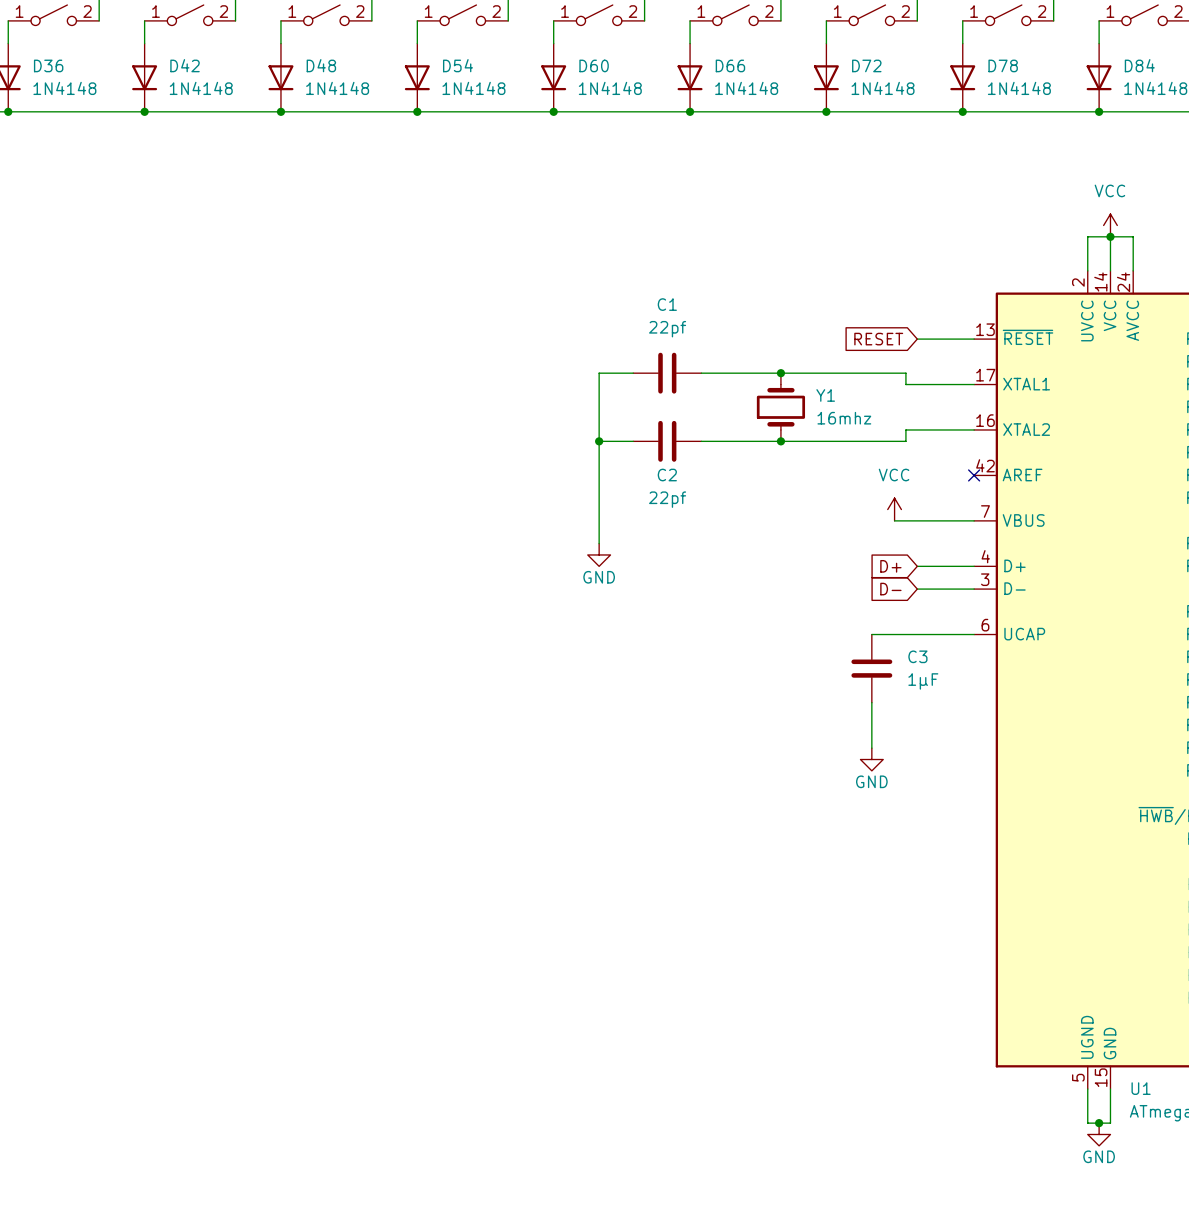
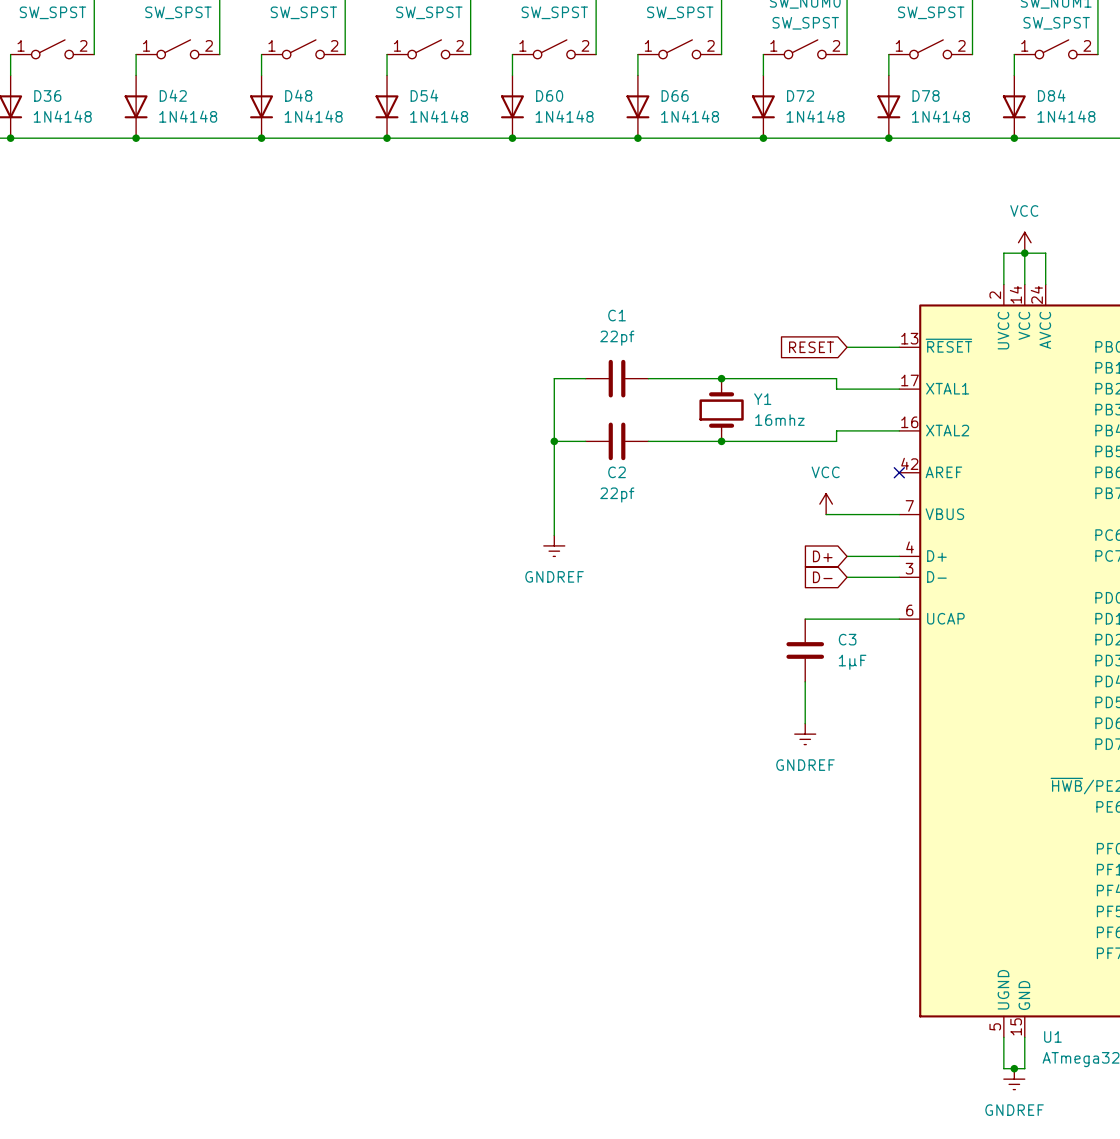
power symbol: GND (599, 554) -> GNDREF (554, 545)
power symbol: GND (871, 759) -> GNDREF (805, 734)
power symbol: GND (1099, 1134) -> GNDREF (1014, 1079)

